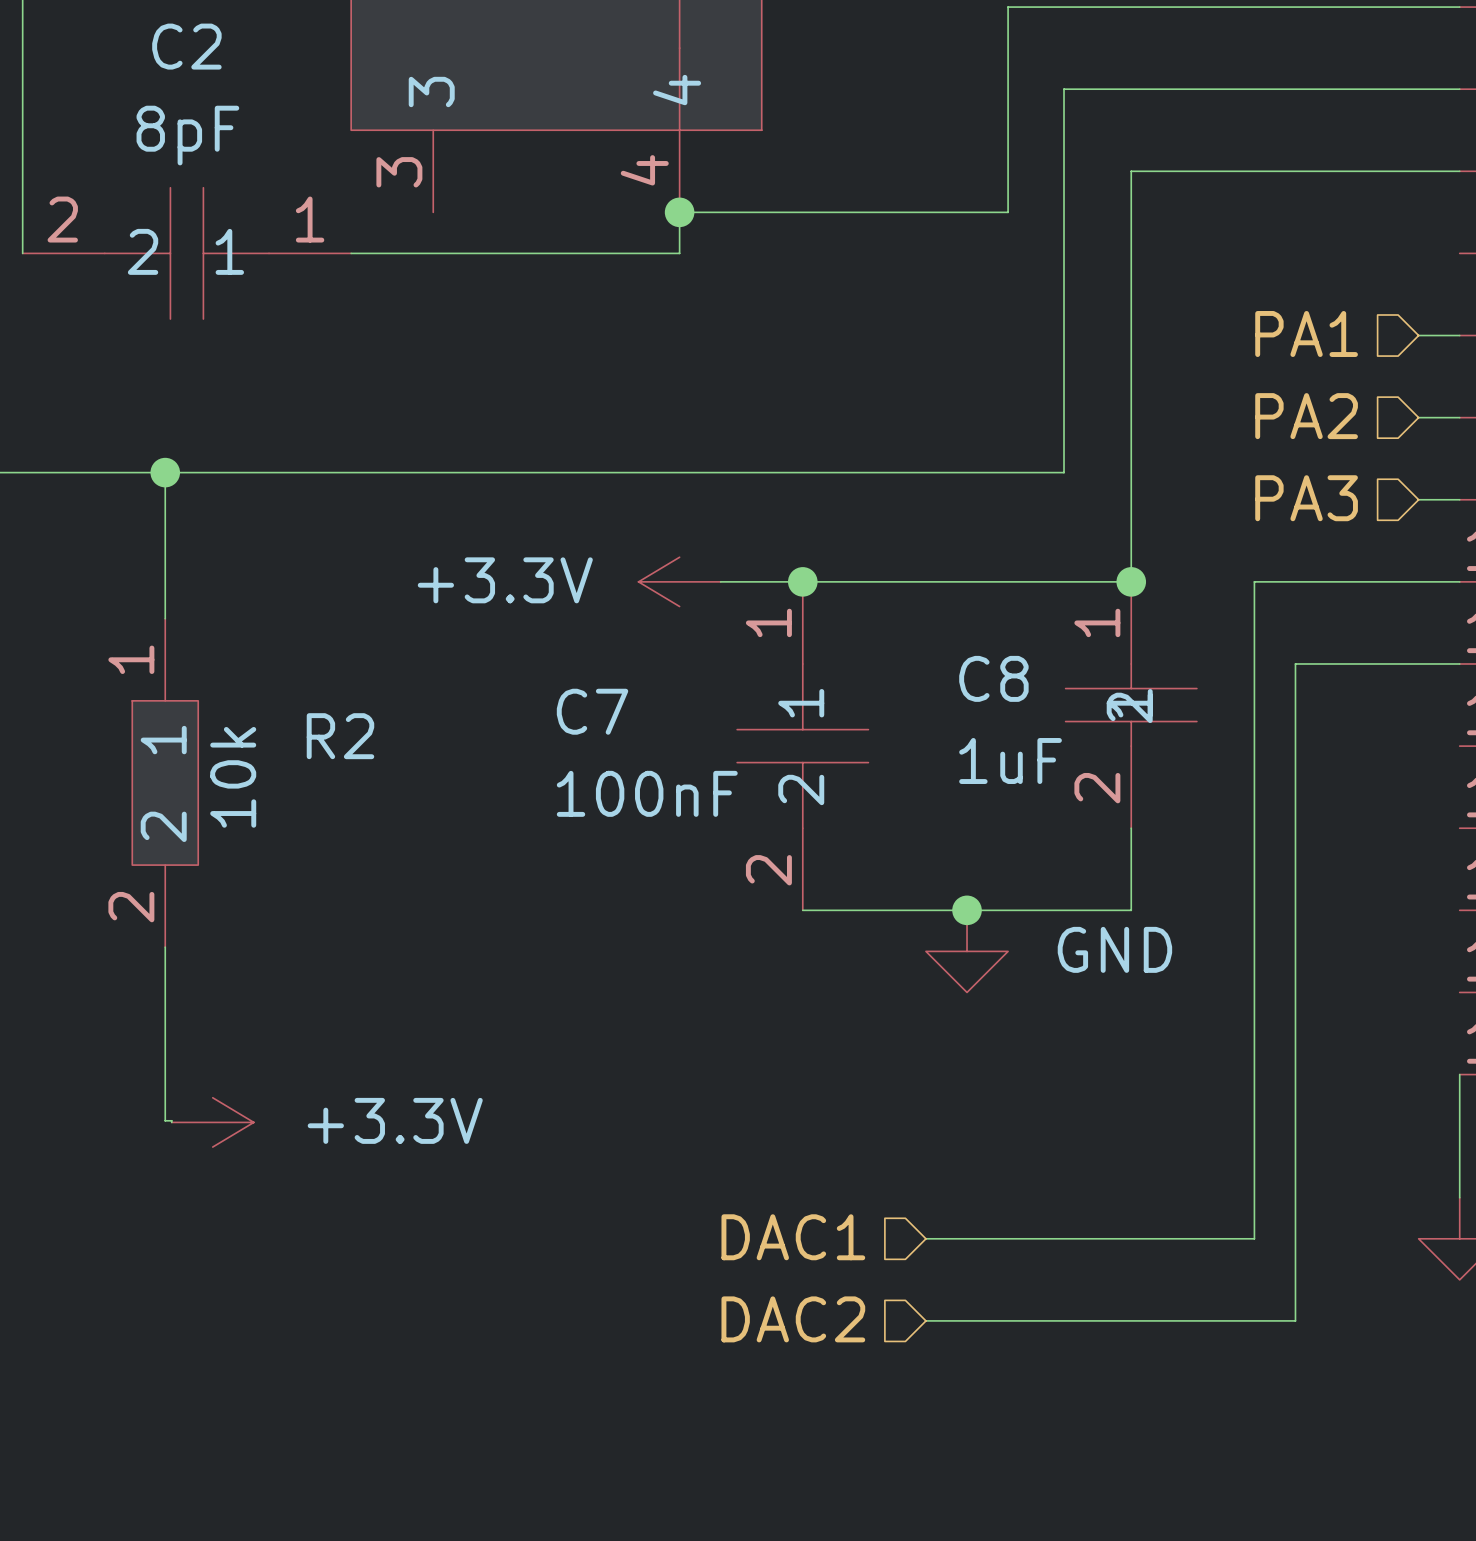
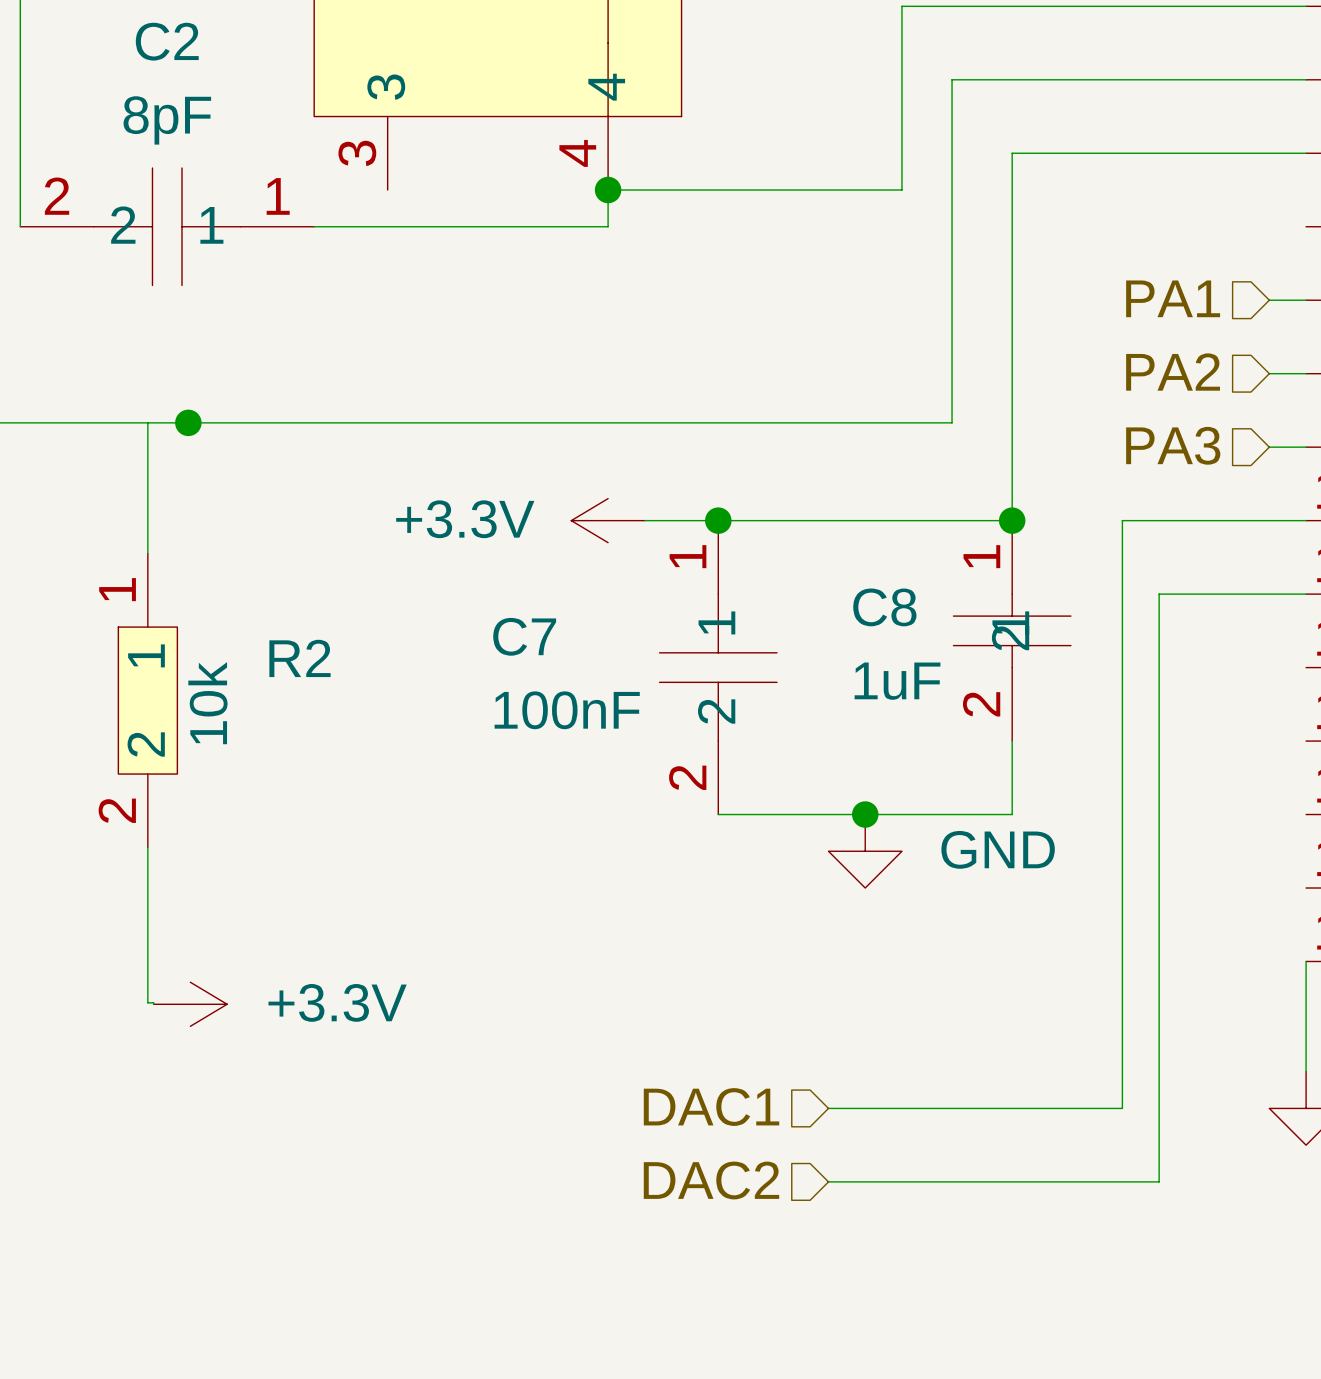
junction position: (165, 472) -> (188, 422)

